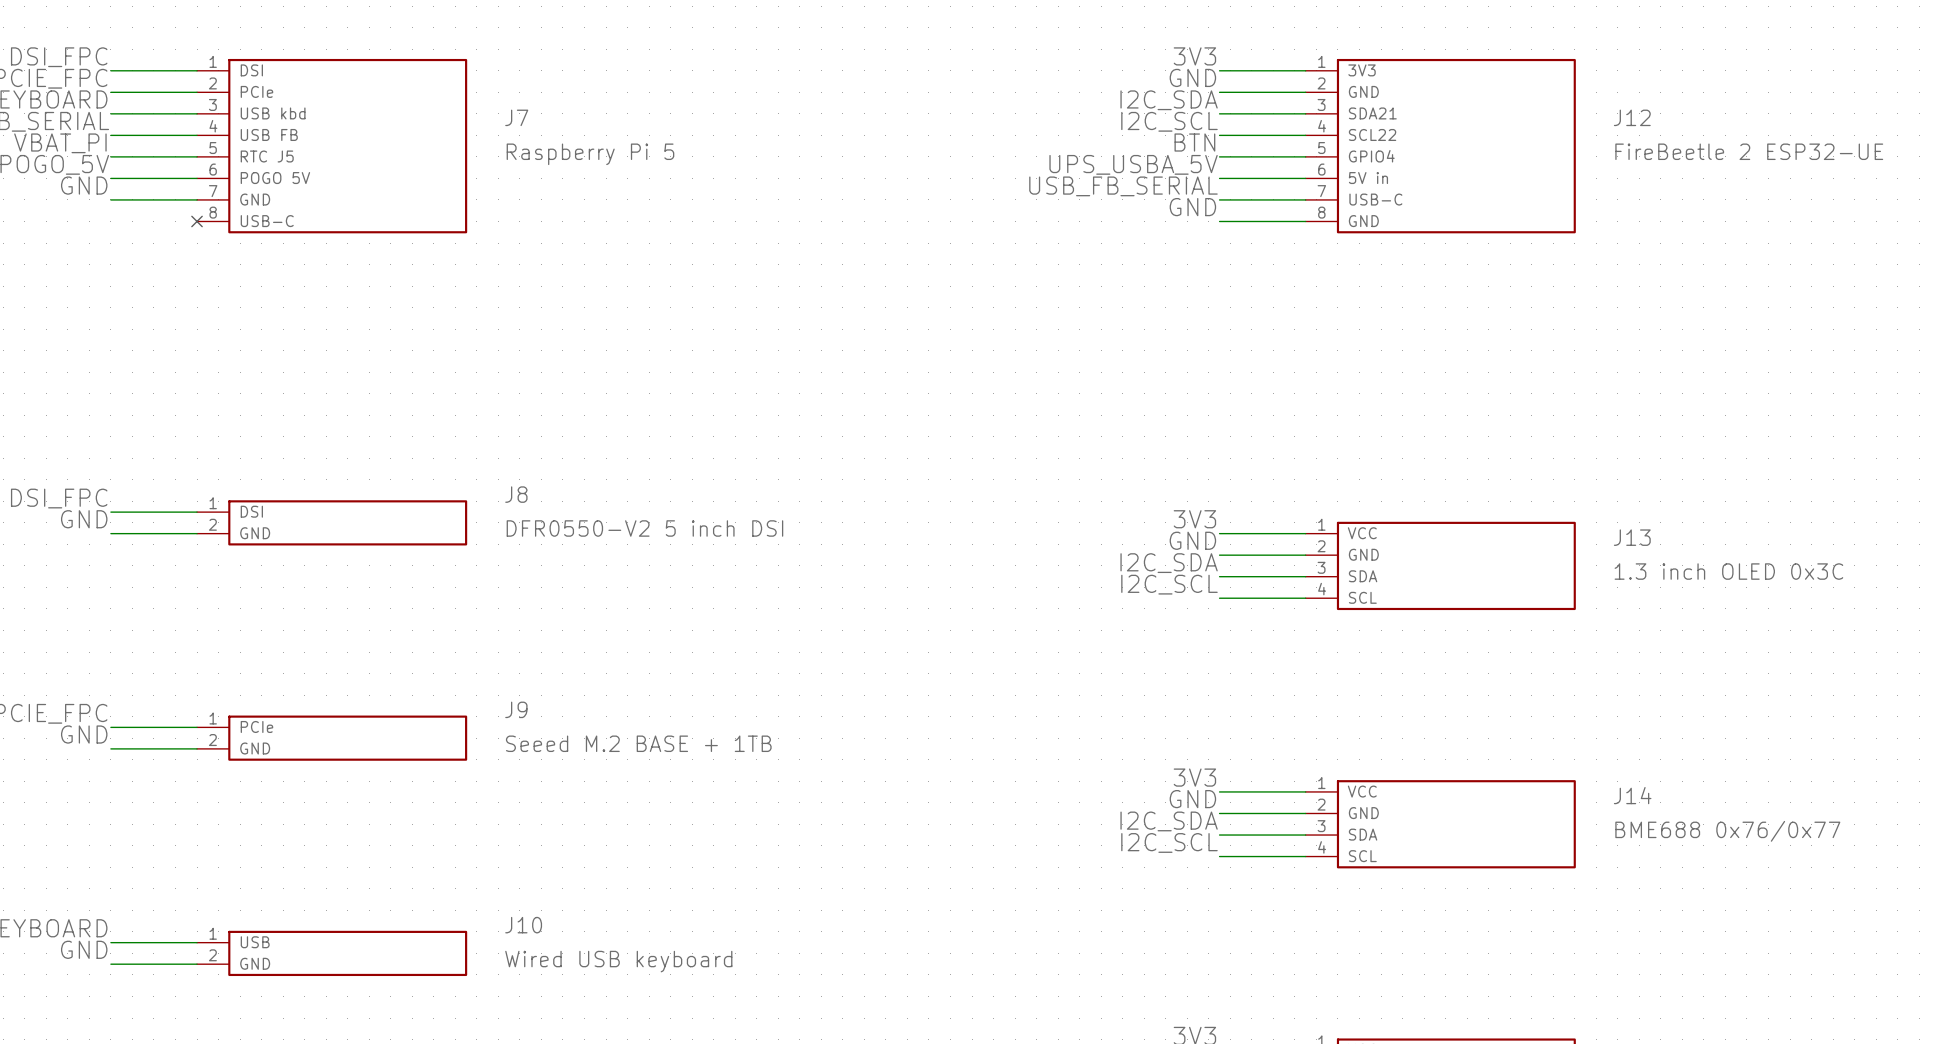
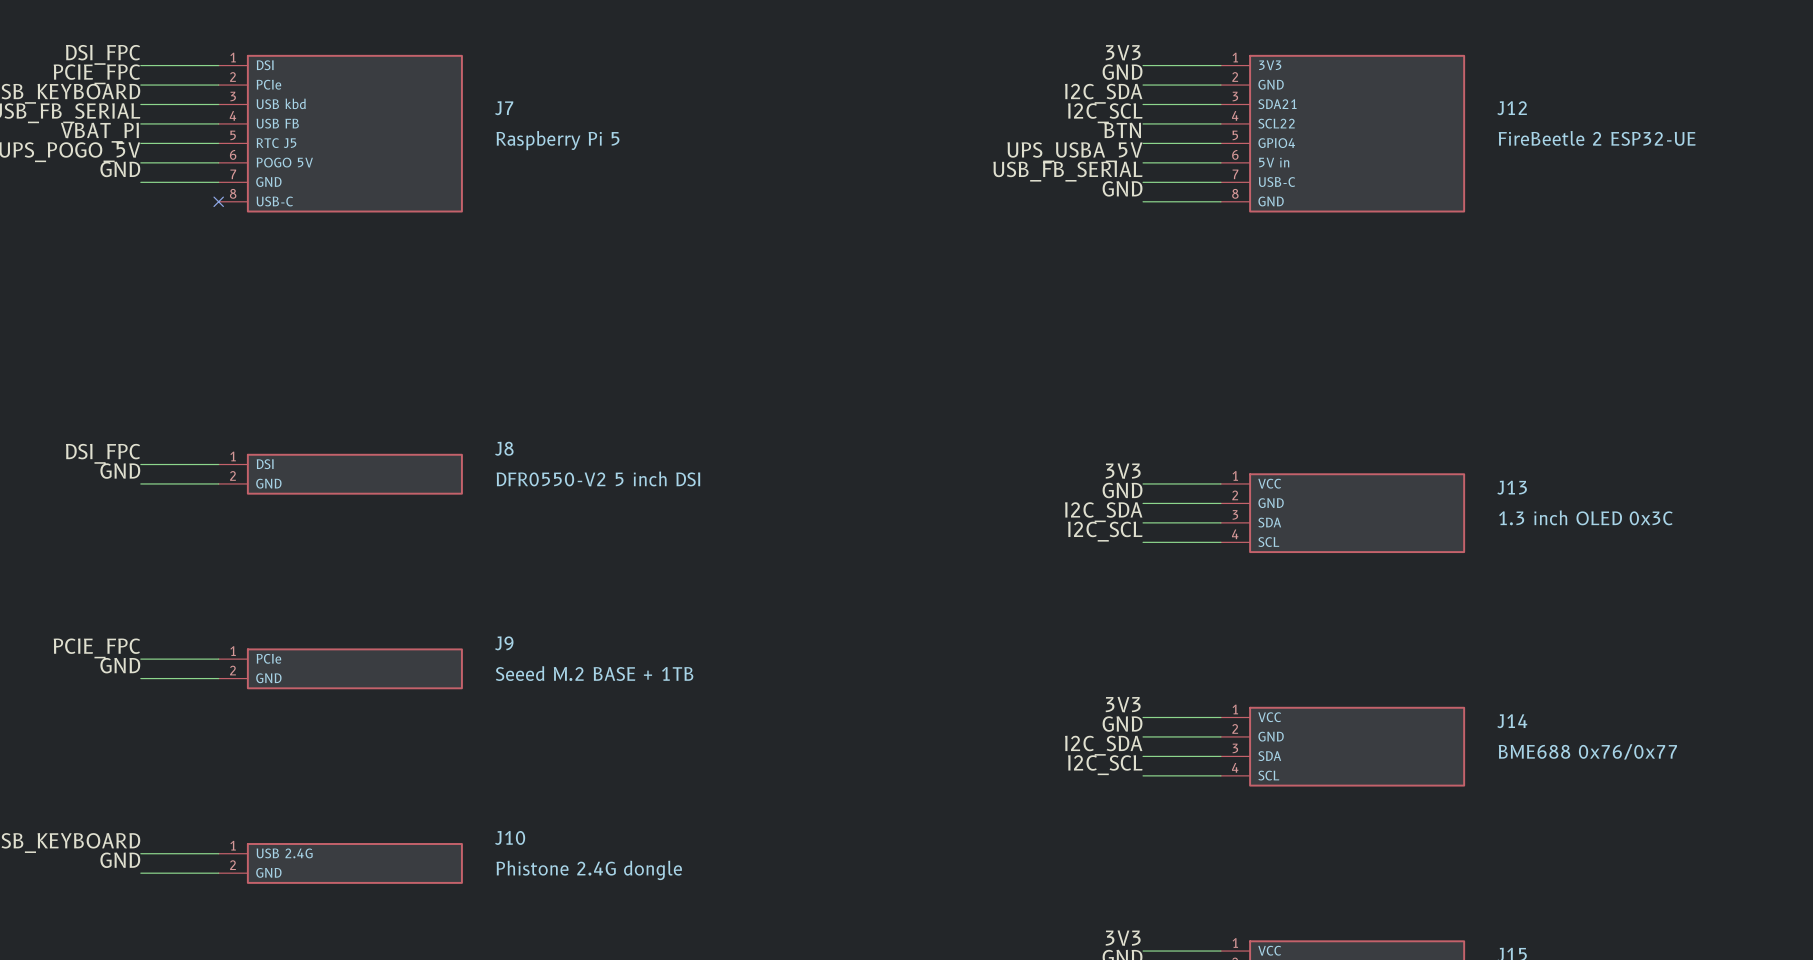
J10 pin name: USB (255, 942) -> USB 2.4G (284, 853)
J10 value: Wired USB keyboard (618, 961) -> Phistone 2.4G dongle (589, 870)

